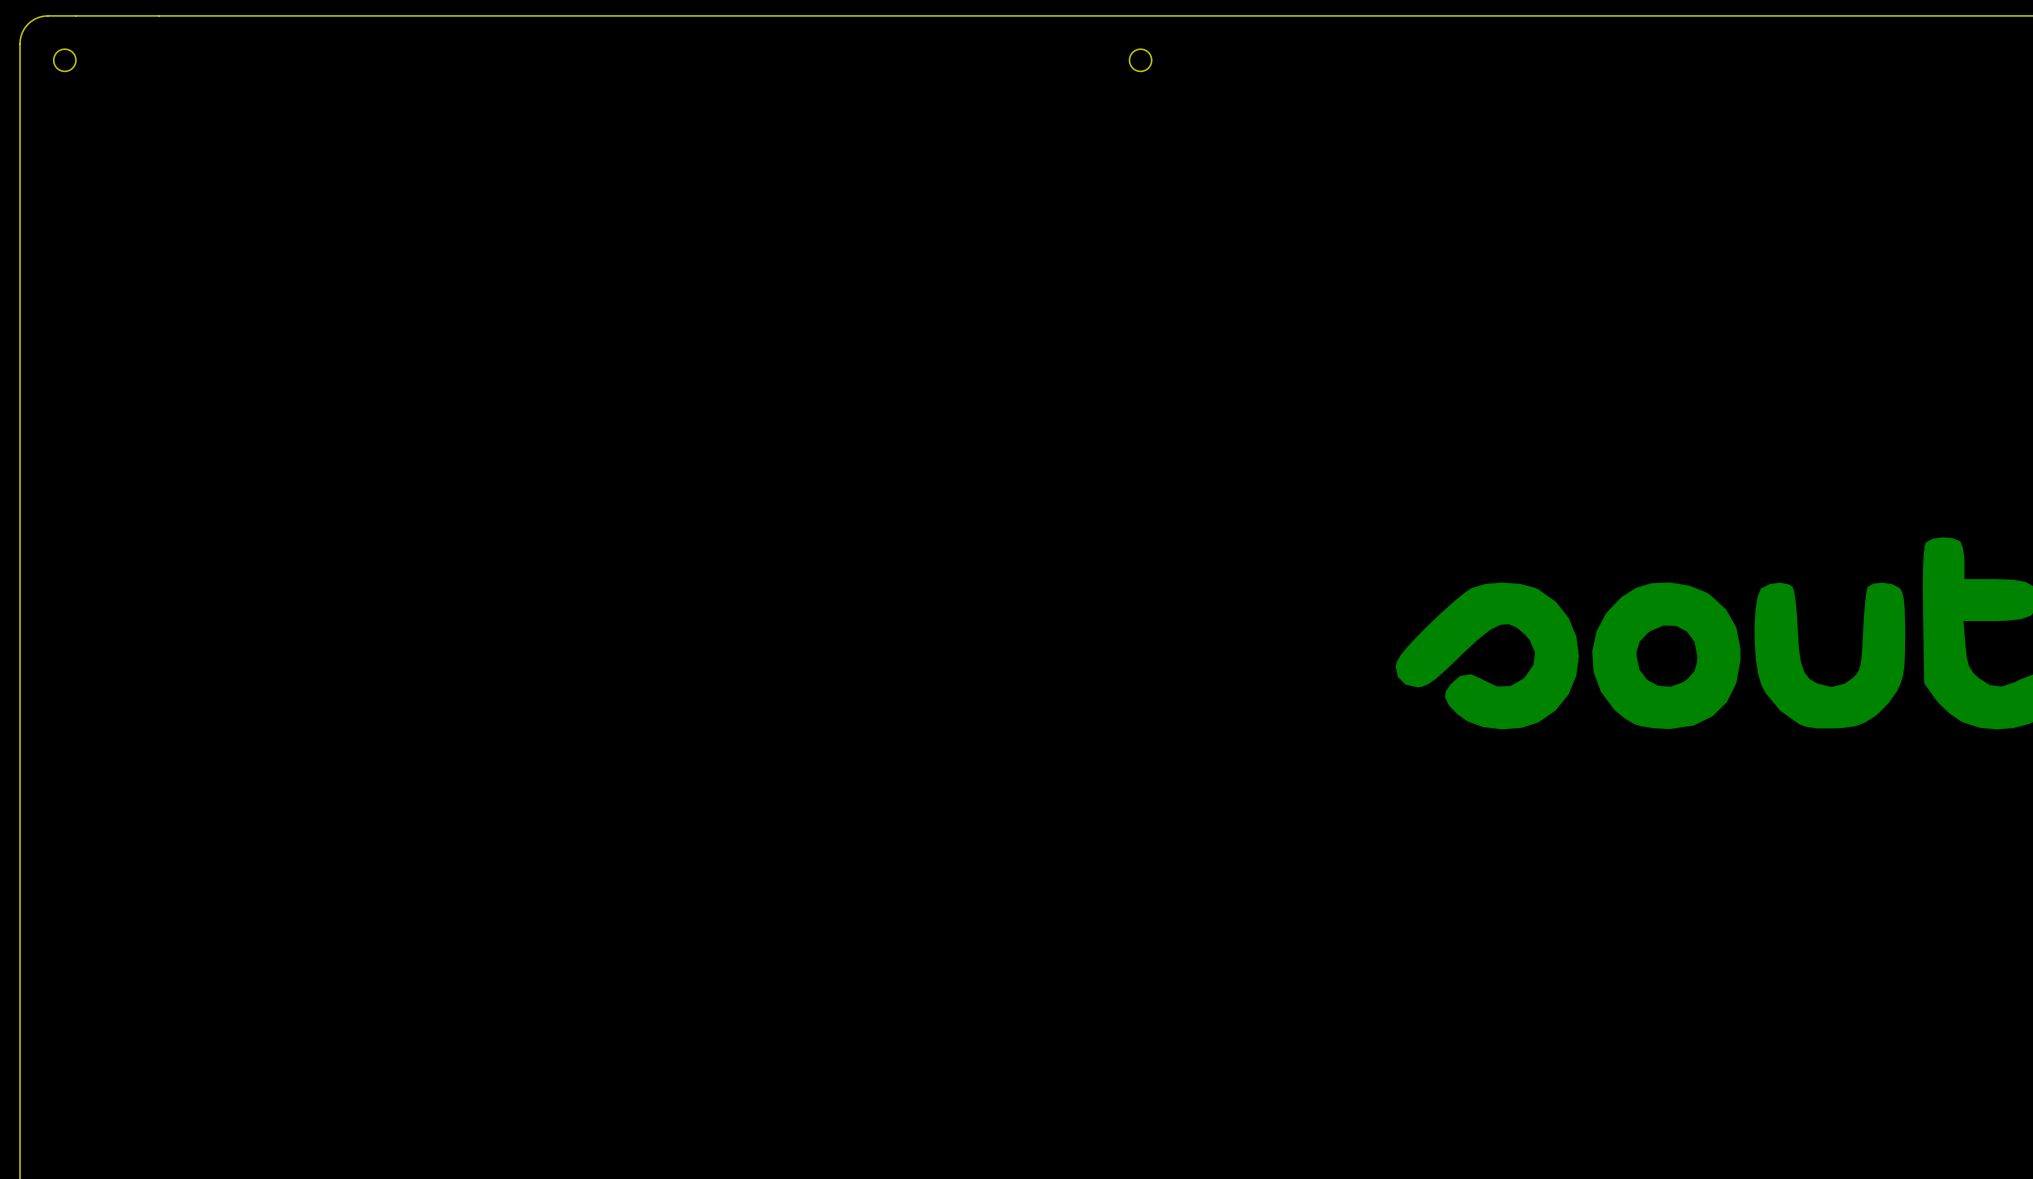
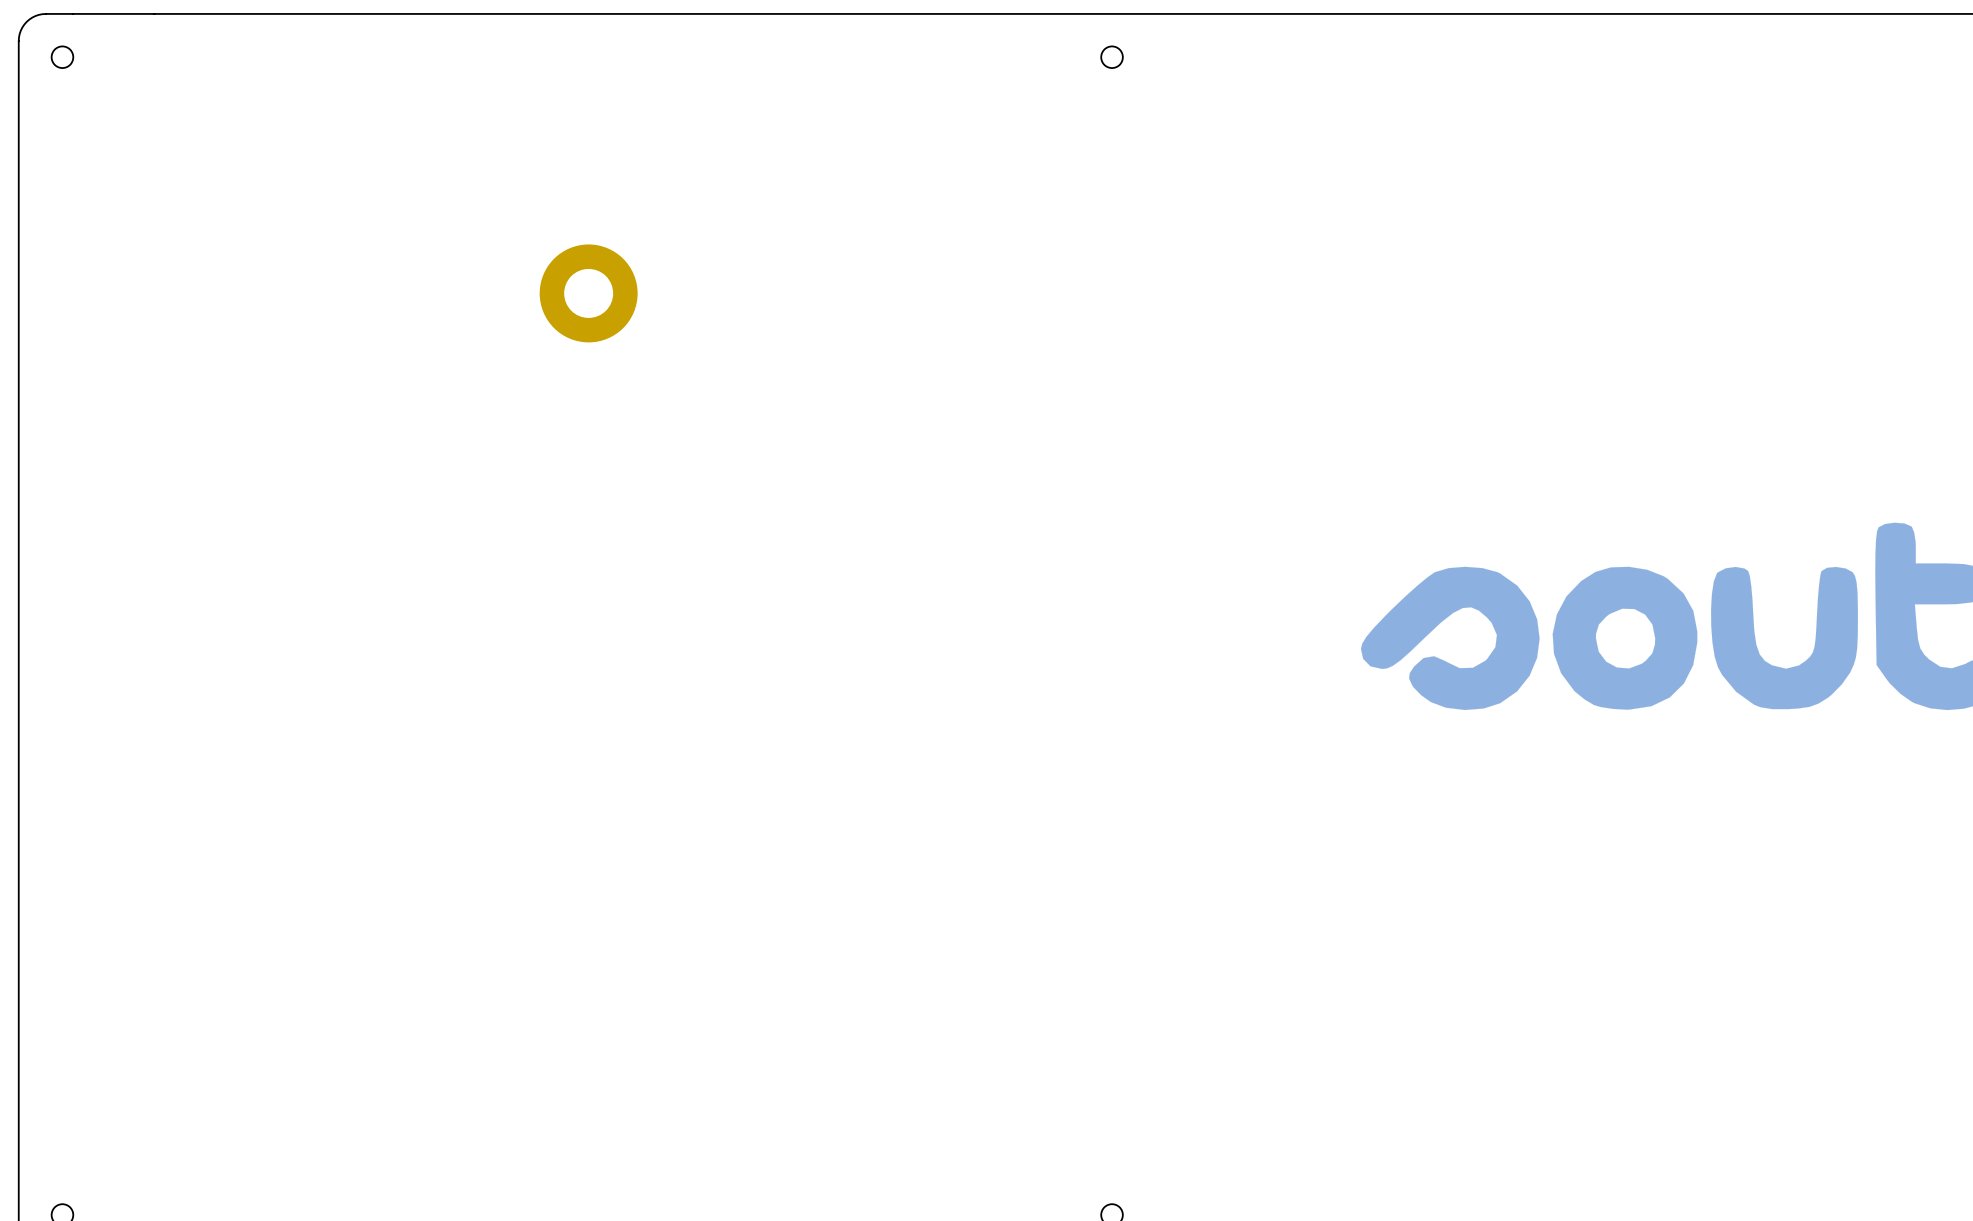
part: none -> (588, 293)

